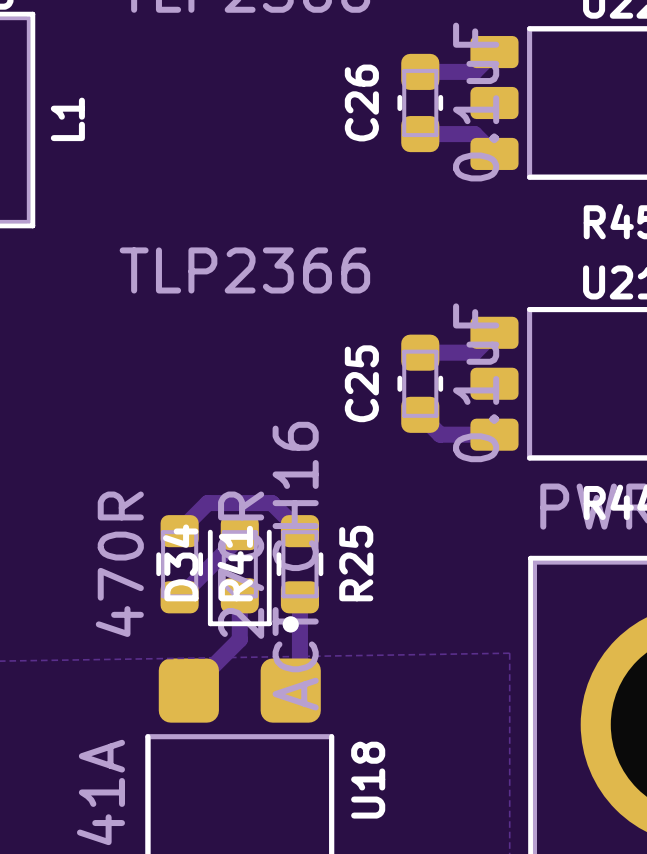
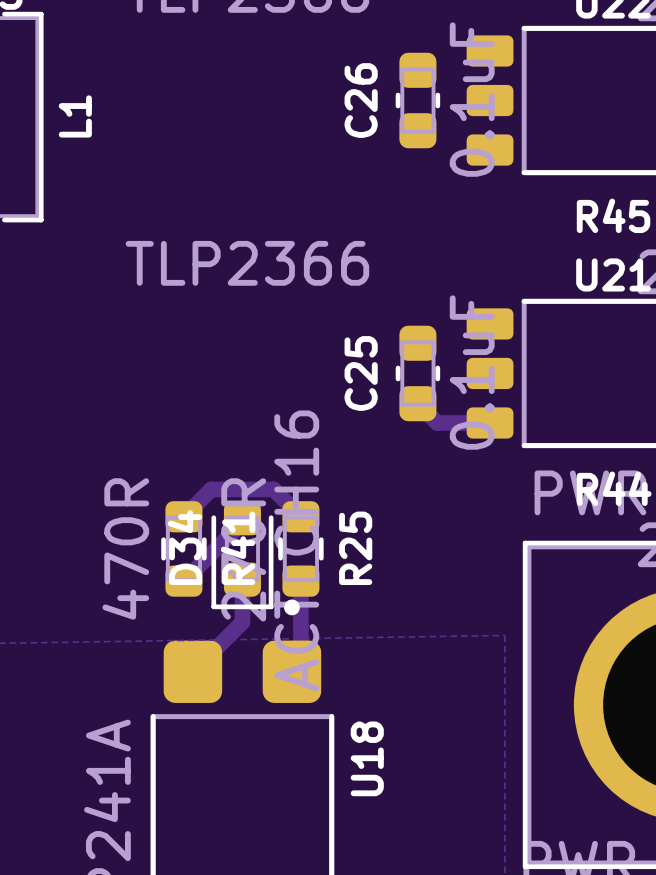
track: (494, 52) (474, 71) (420, 71) -> none
track: (420, 134) (474, 134) (494, 153) -> none
track: (494, 332) (474, 352) (420, 352) -> none

